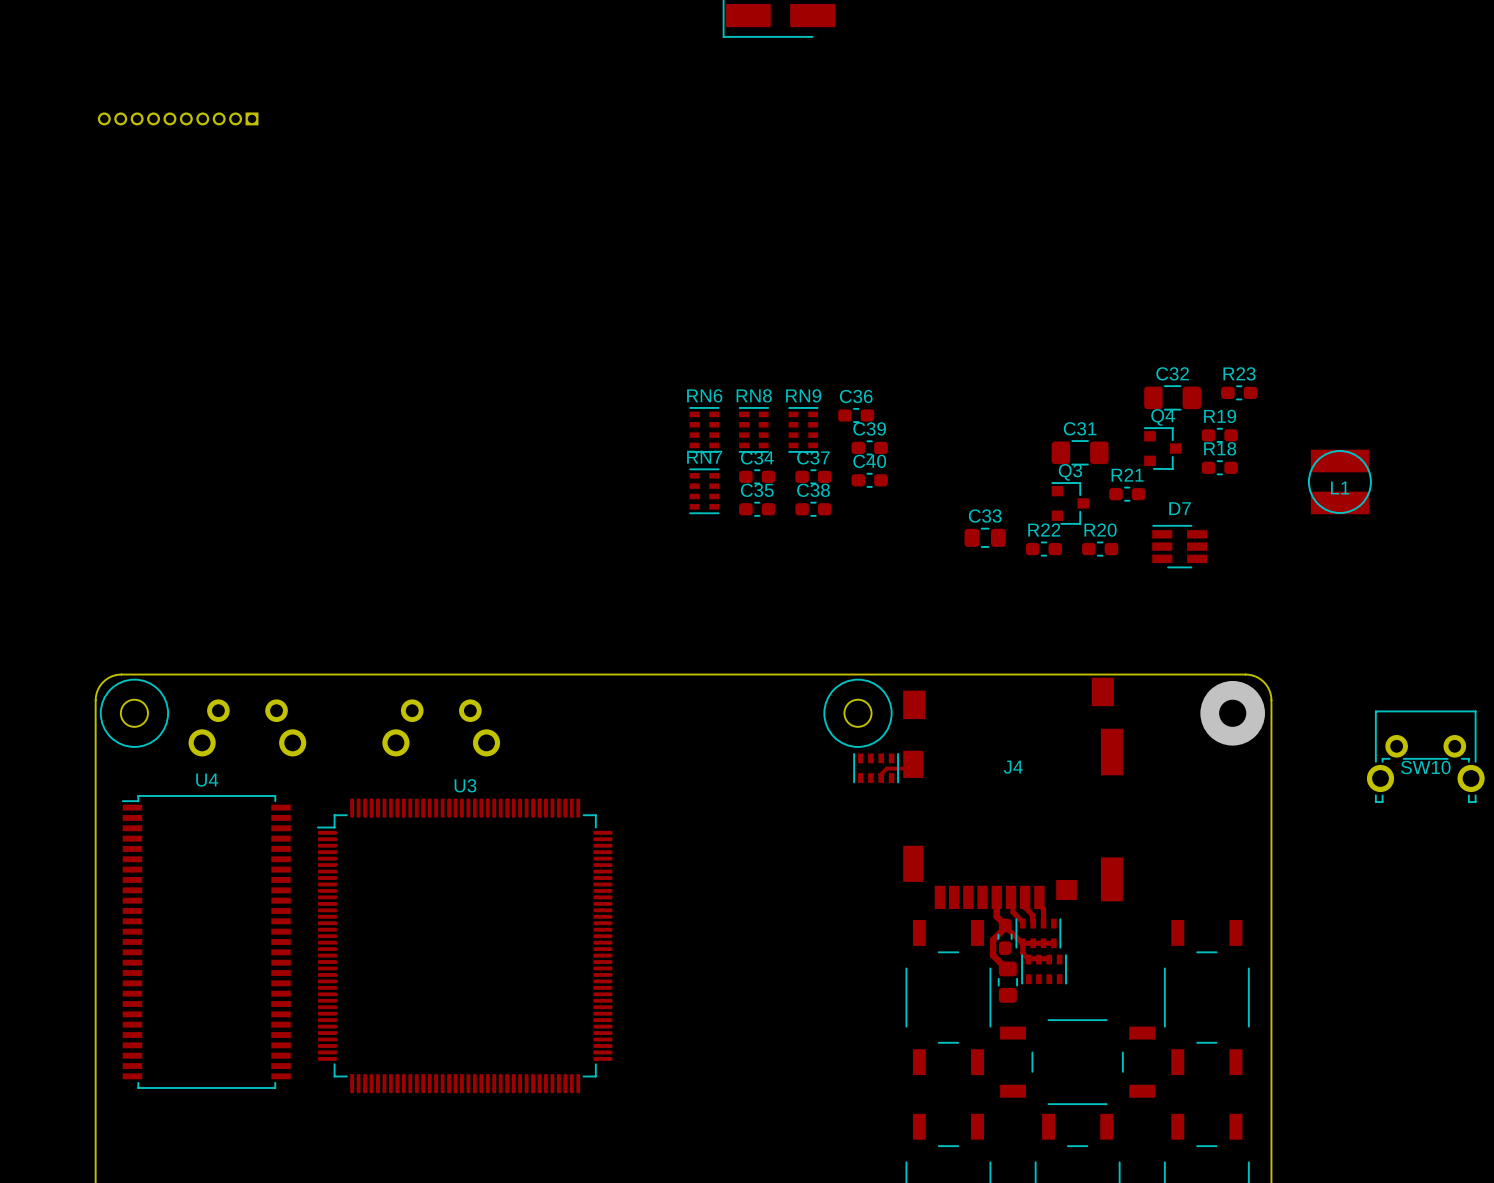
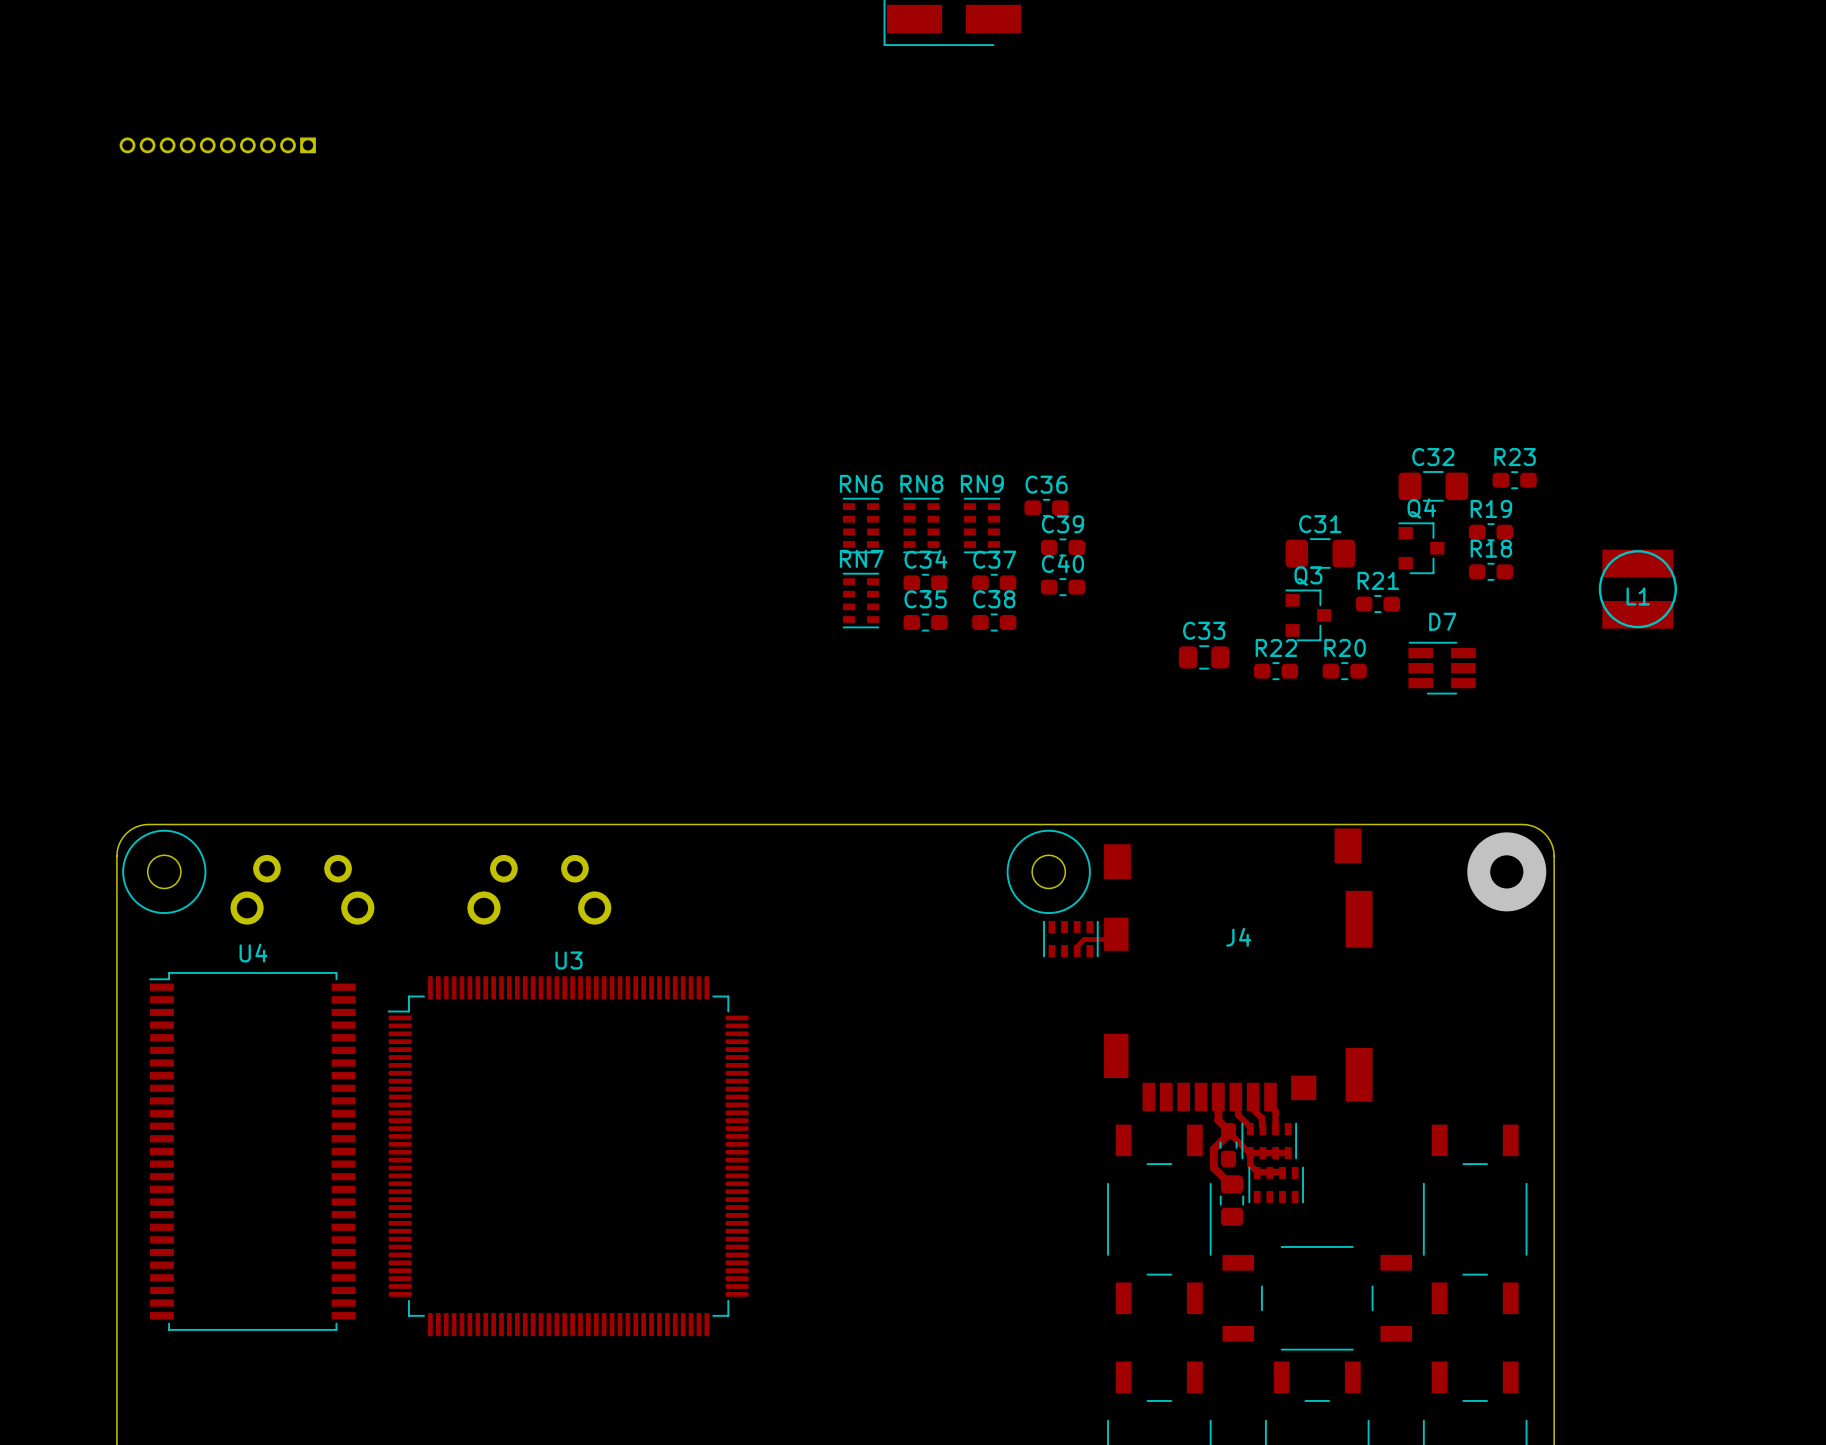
SW10: (1425, 756) -> none

